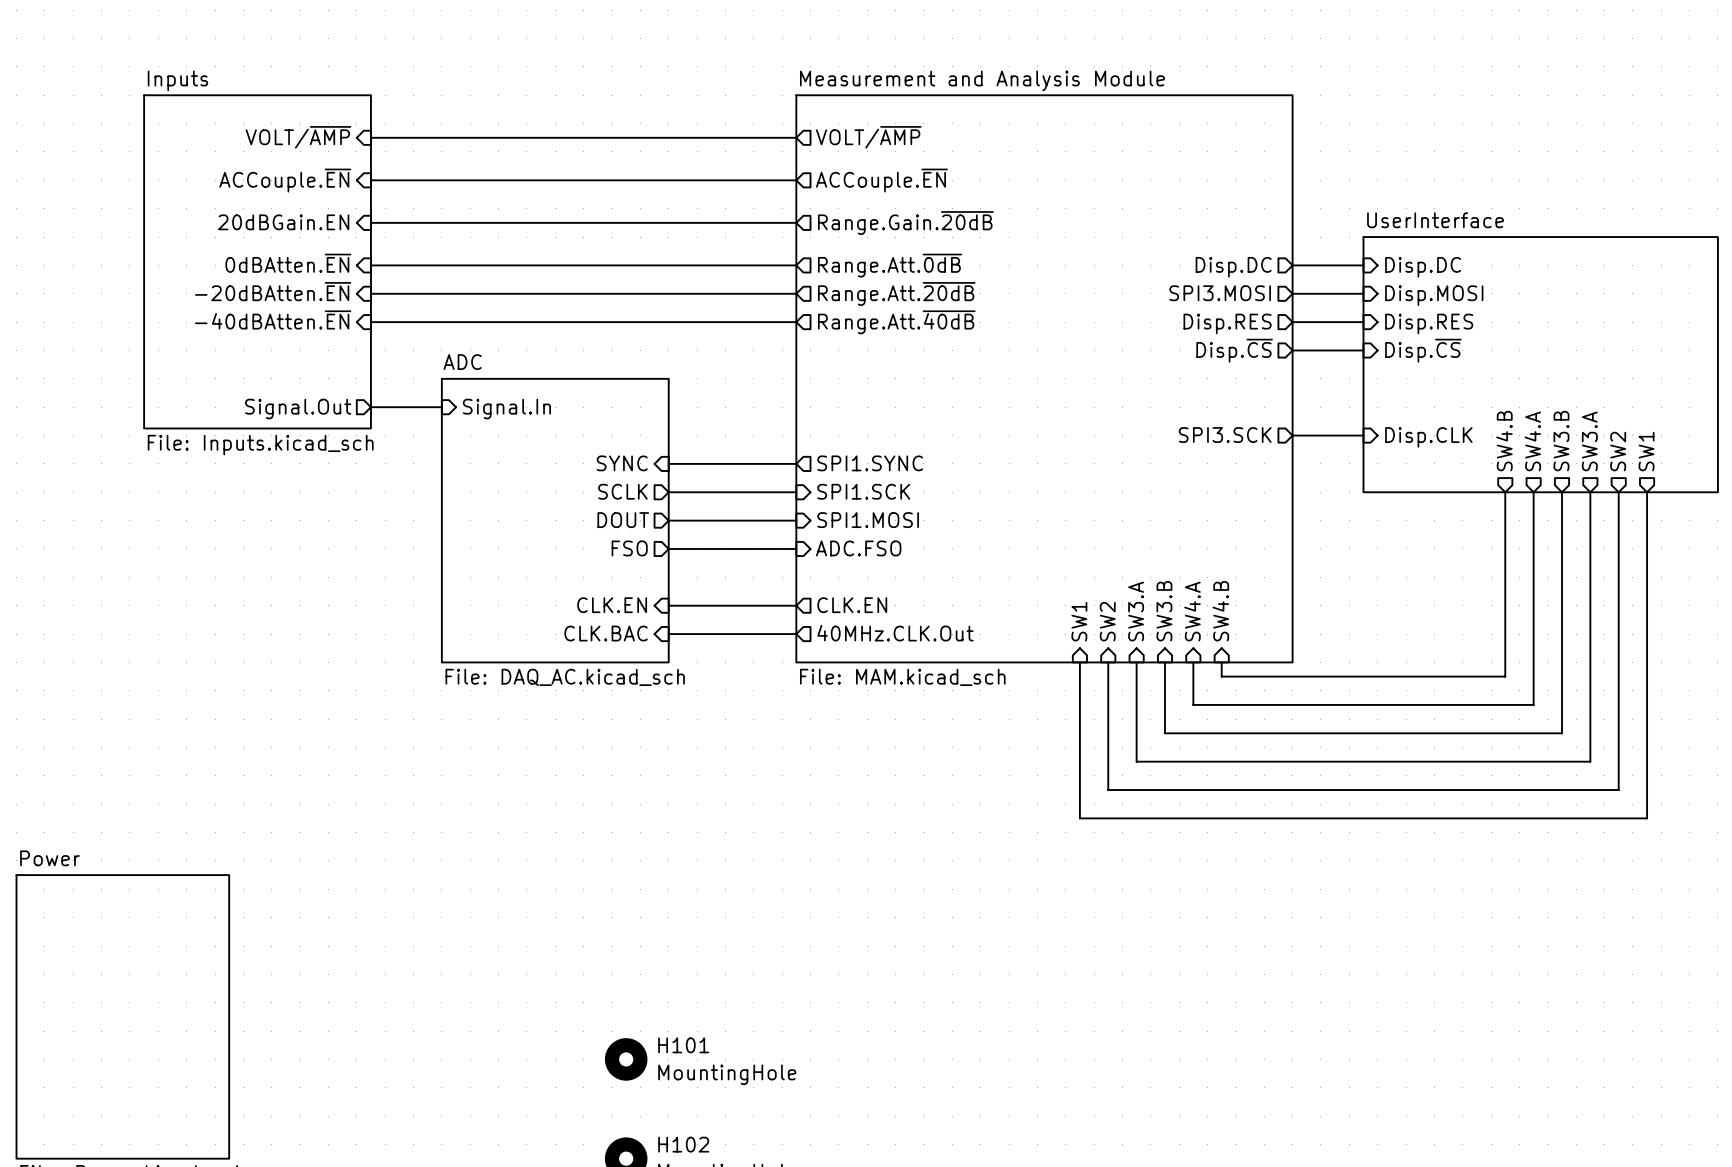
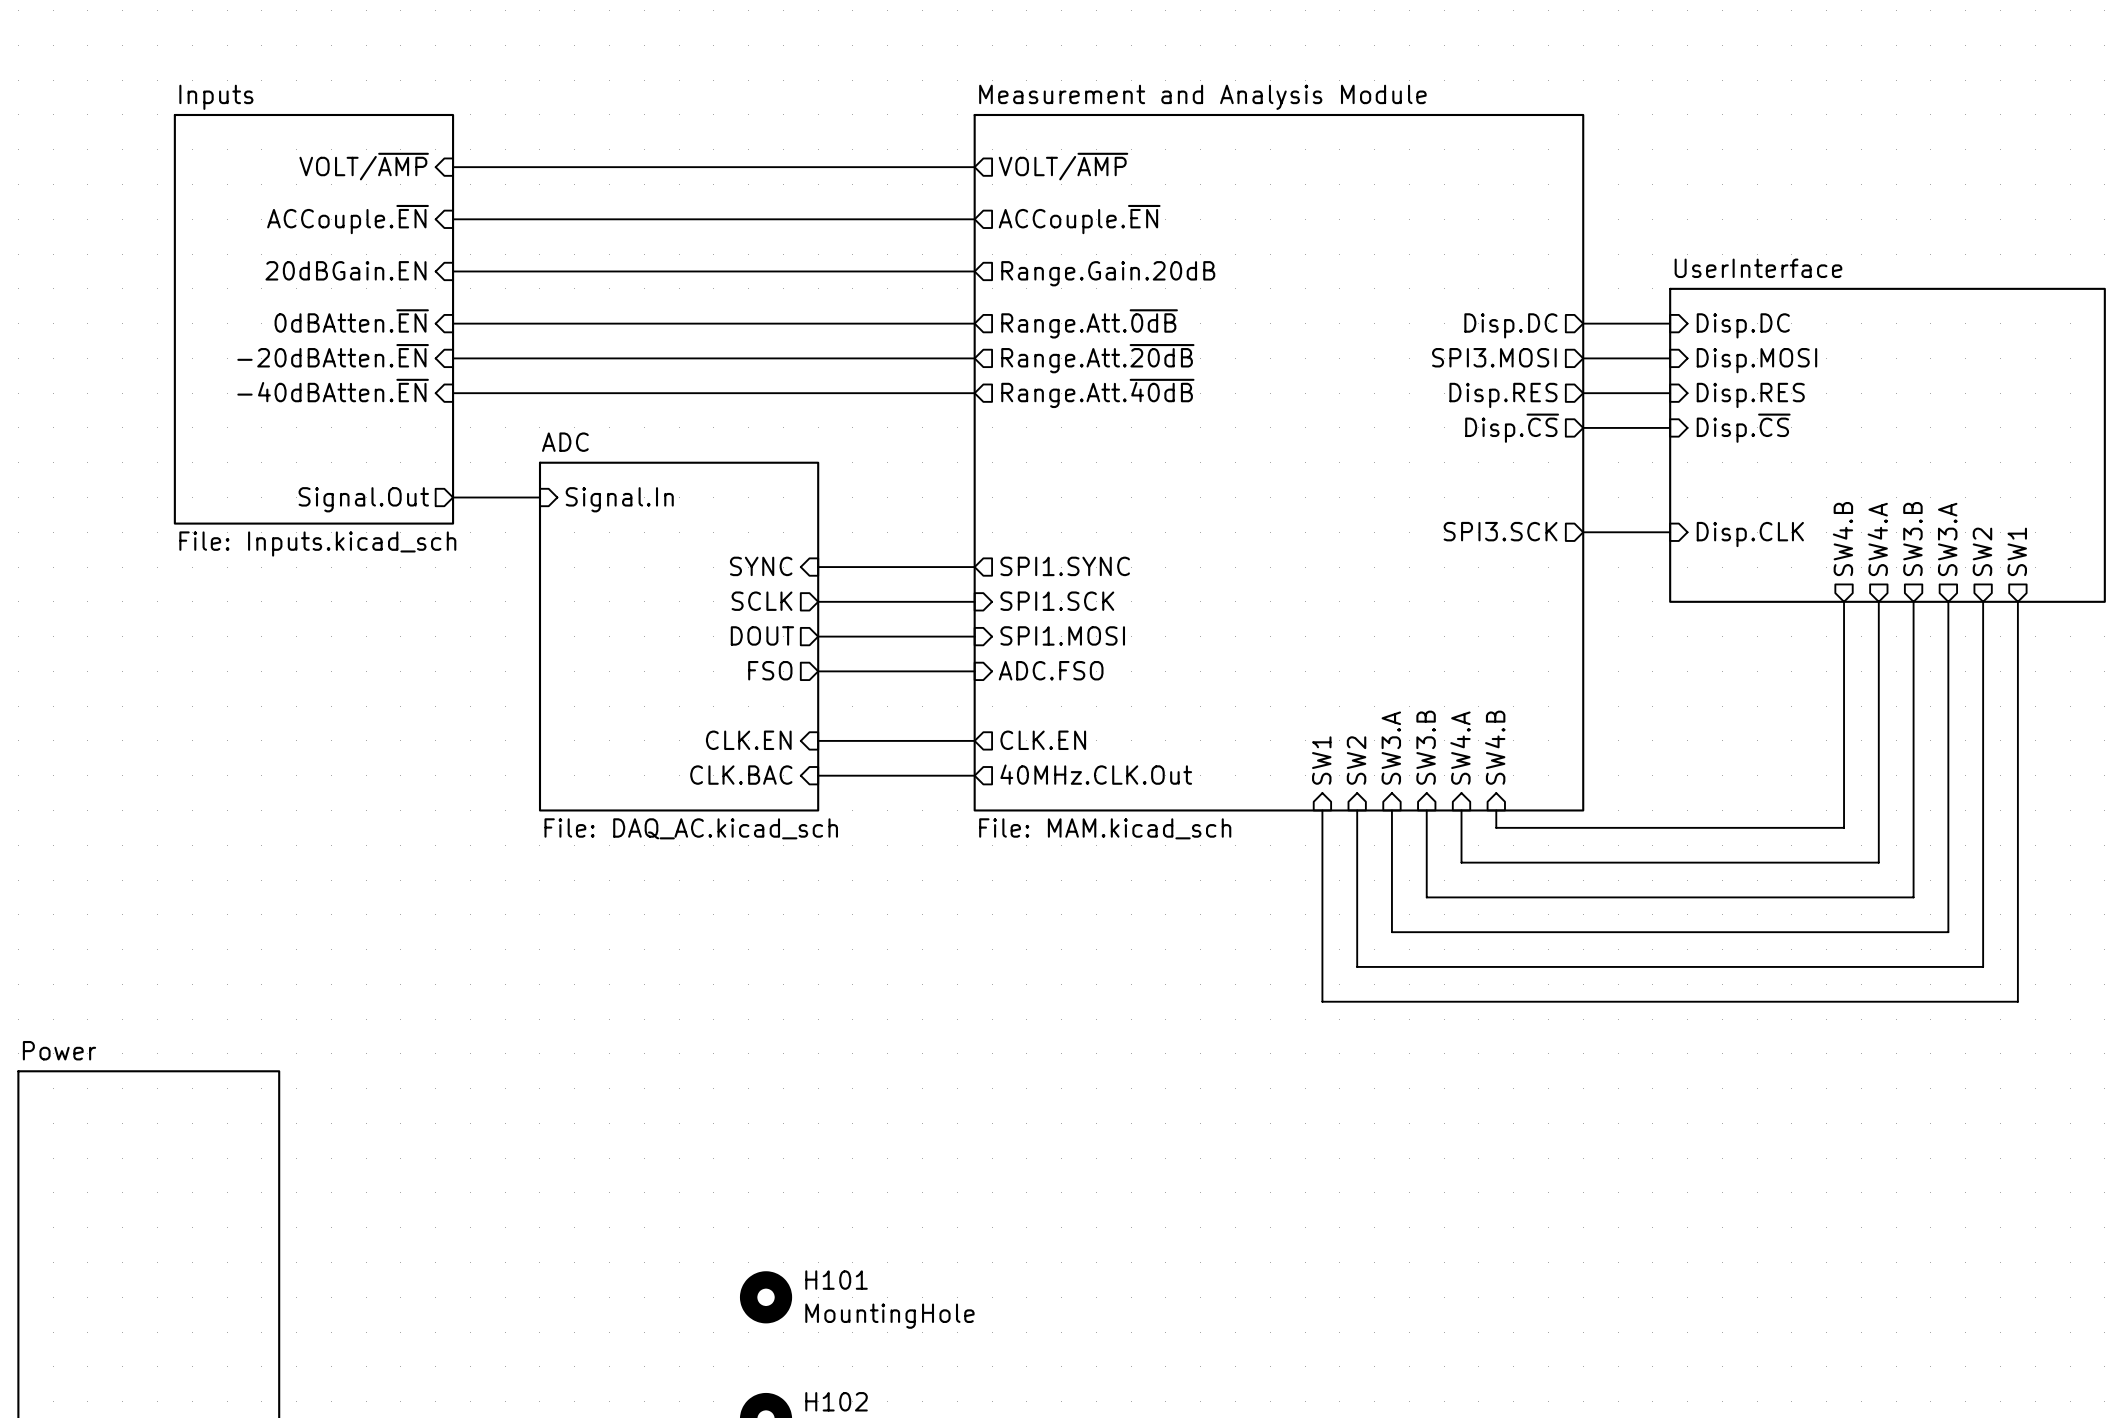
sheet pin: Range.Gain.~{20dB} (905, 223) -> Range.Gain.20dB (1108, 273)

